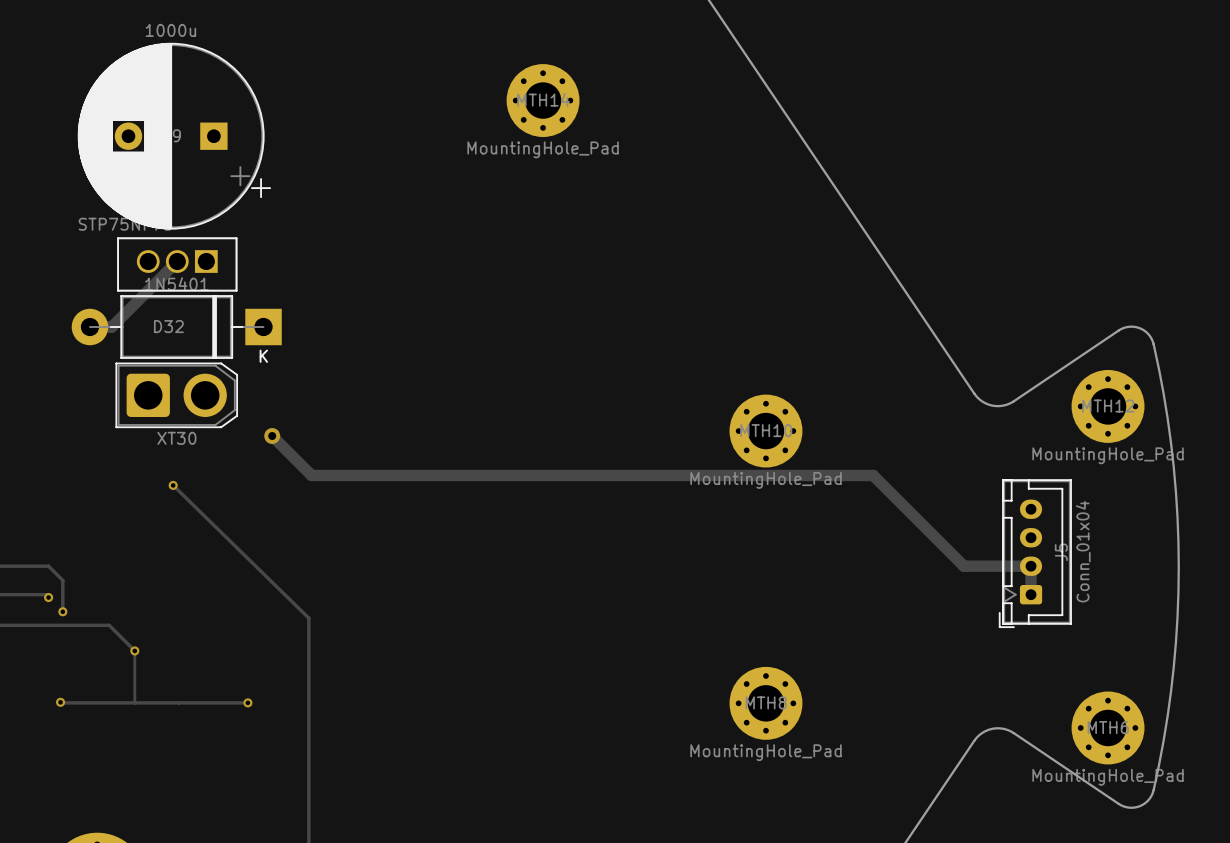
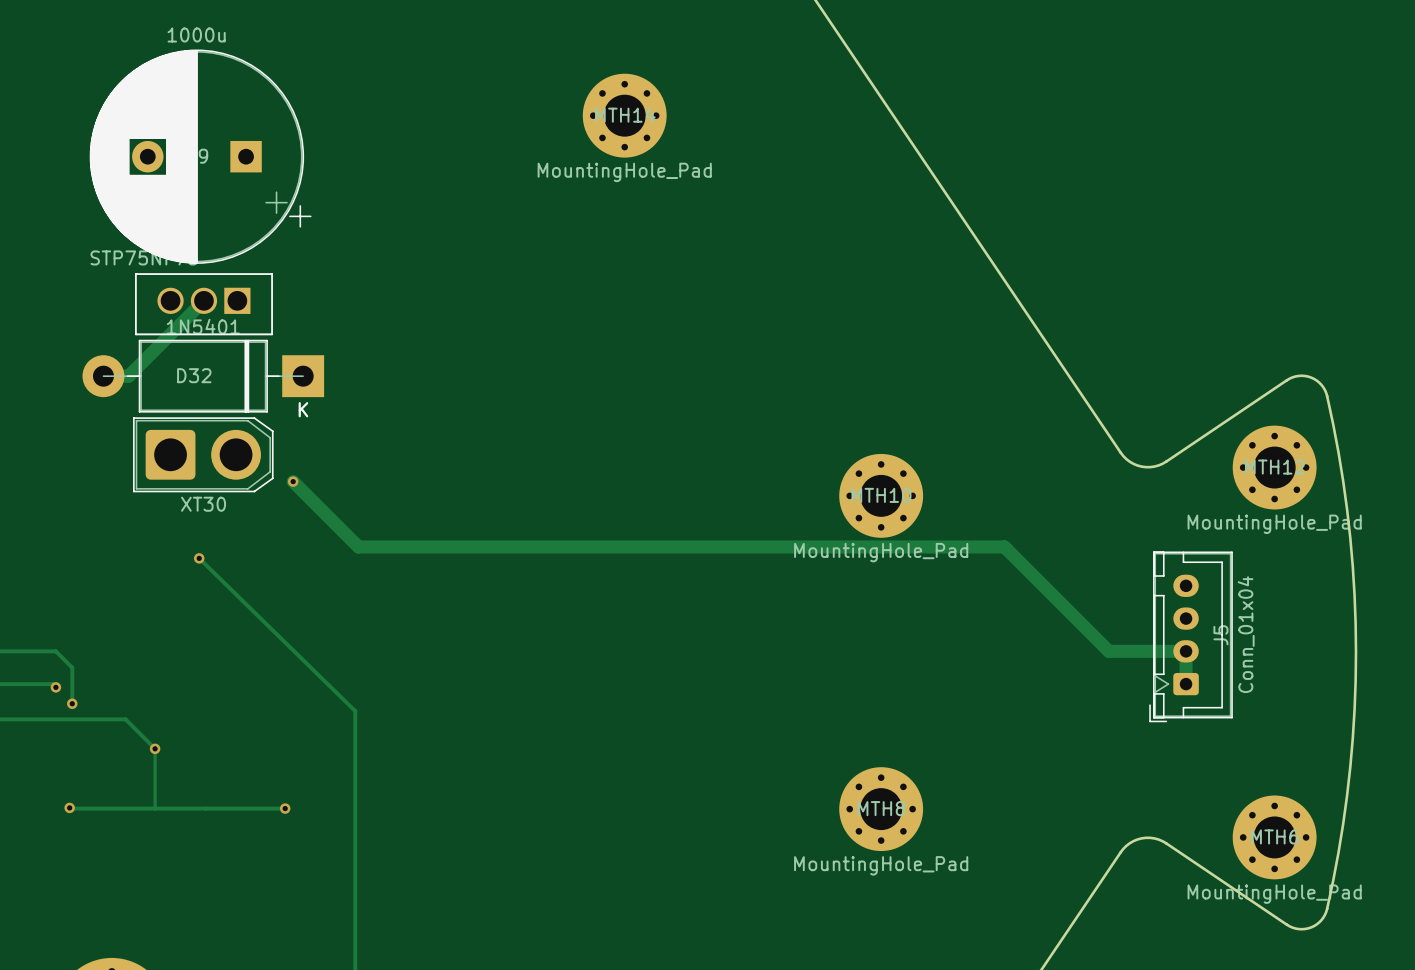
track: none -> (293, 481) (313, 501)
via: none -> (293, 481)
via: (272, 436) -> none

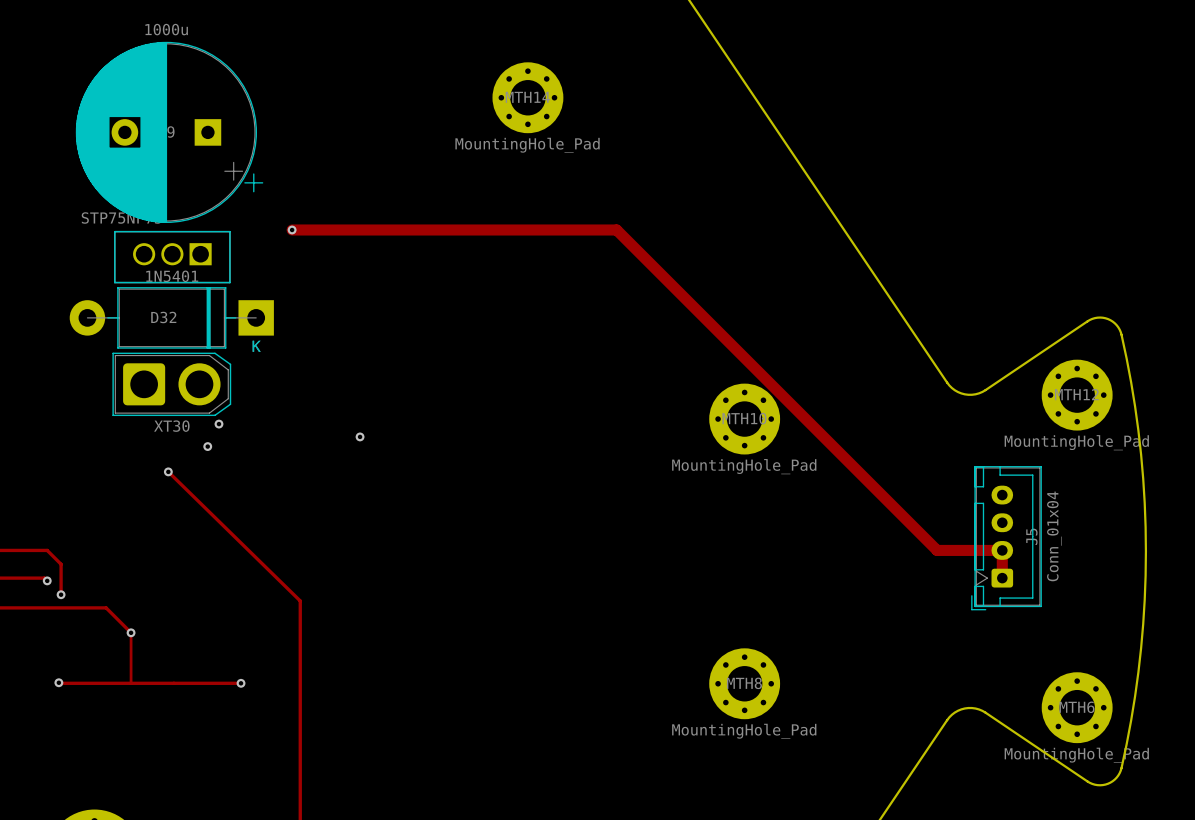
via: none -> (292, 229)
track: (203, 300) (128, 376) (103, 376) -> none
track: (293, 481) (358, 546) (1004, 546) -> (292, 229) (616, 229) (848, 462)
via: (293, 481) -> none
via: none -> (218, 424)
via: none -> (360, 436)
via: none -> (207, 446)

